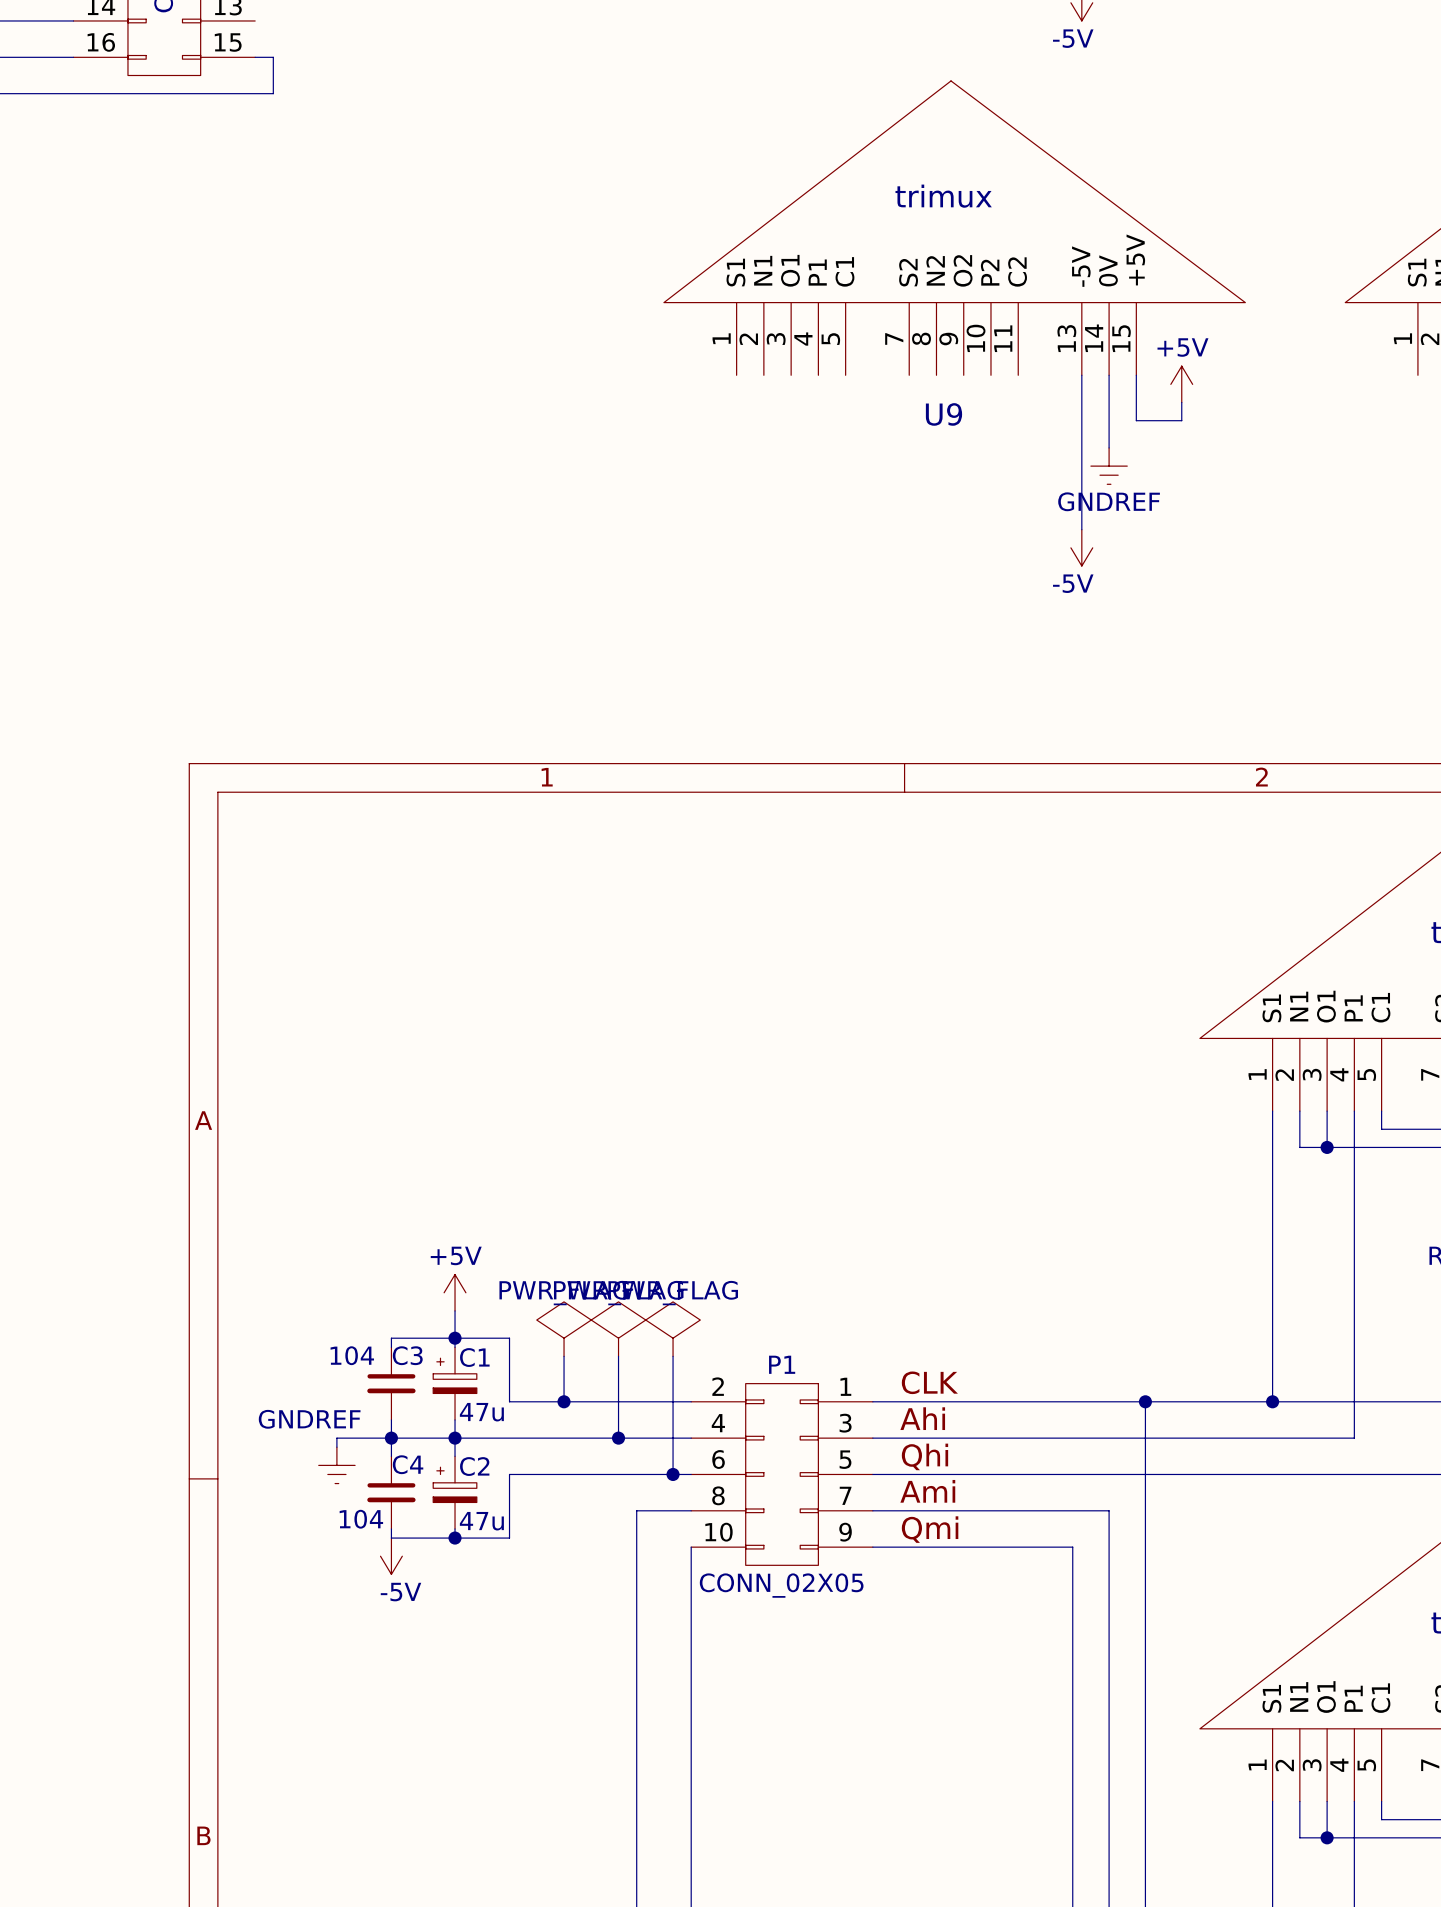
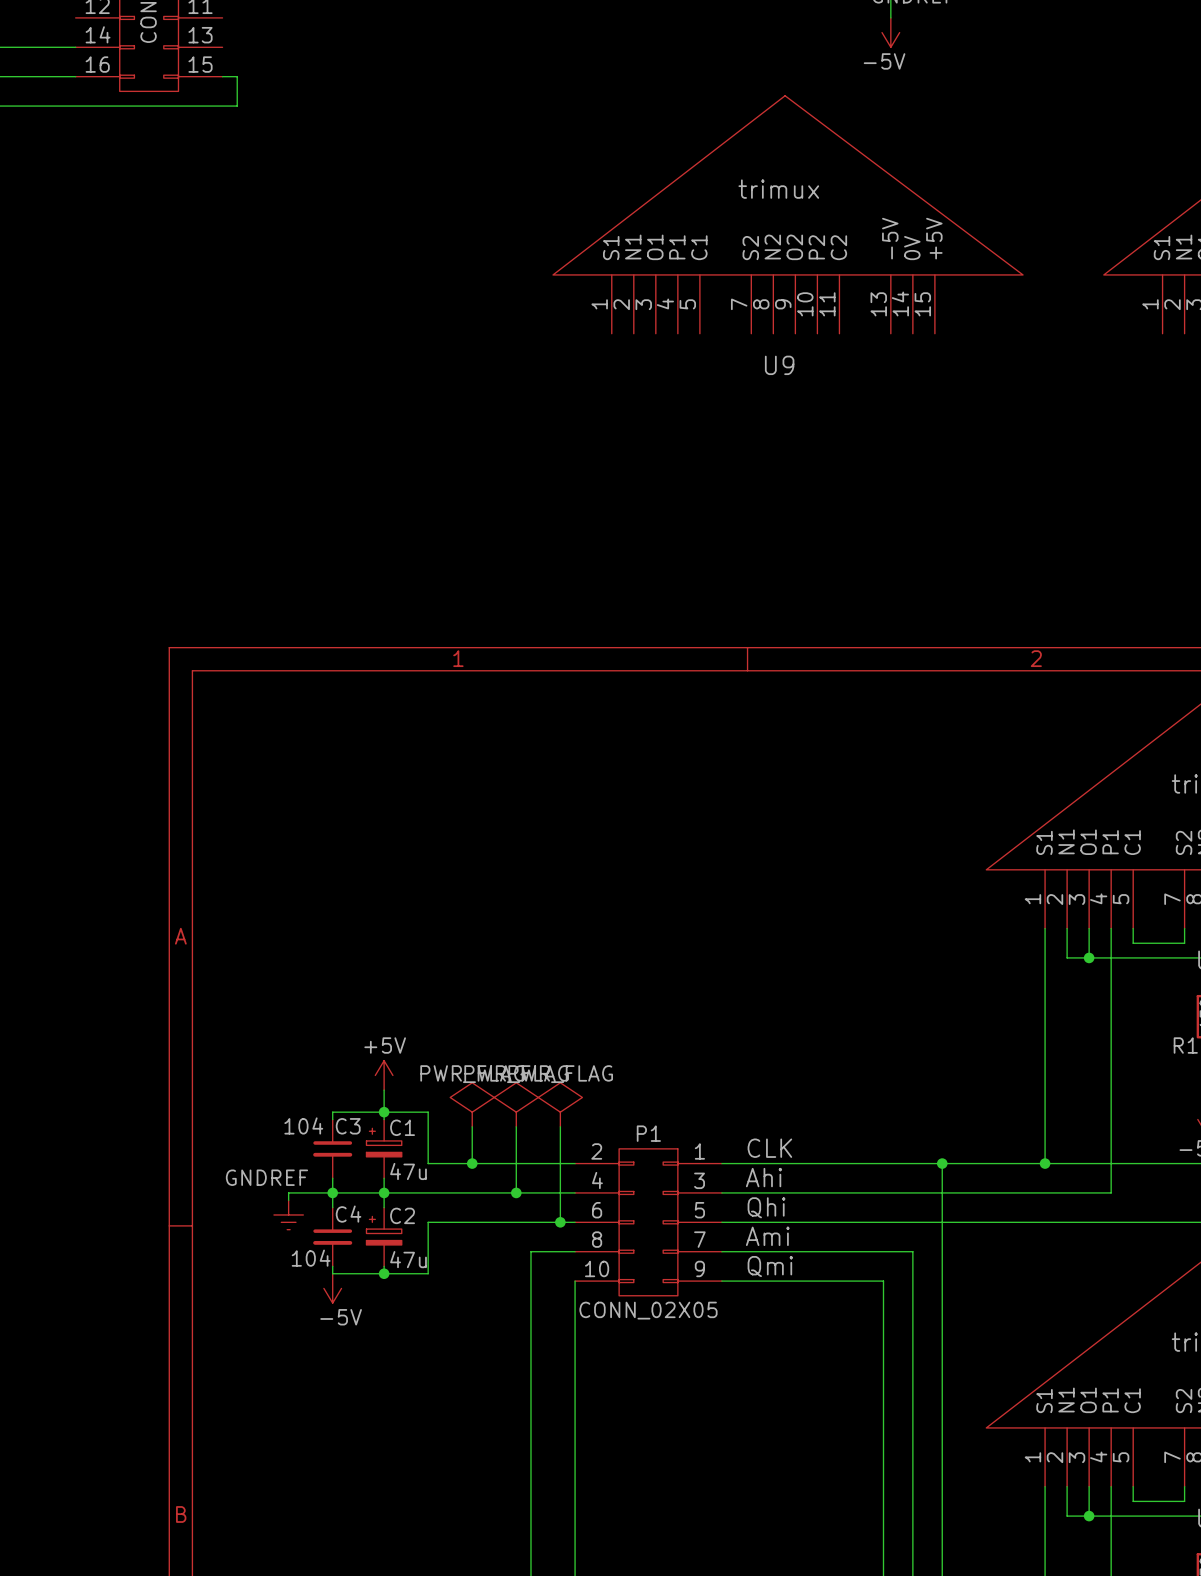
wire: (1081, 375) (1081, 529) -> none
wire: (1109, 375) (1109, 447) -> none
wire: (1136, 375) (1136, 420) (1181, 420) (1181, 402) -> none
power symbol: +5V (1181, 384) -> none
power symbol: GNDREF (1109, 466) -> none
power symbol: -5V (1081, 547) -> none

